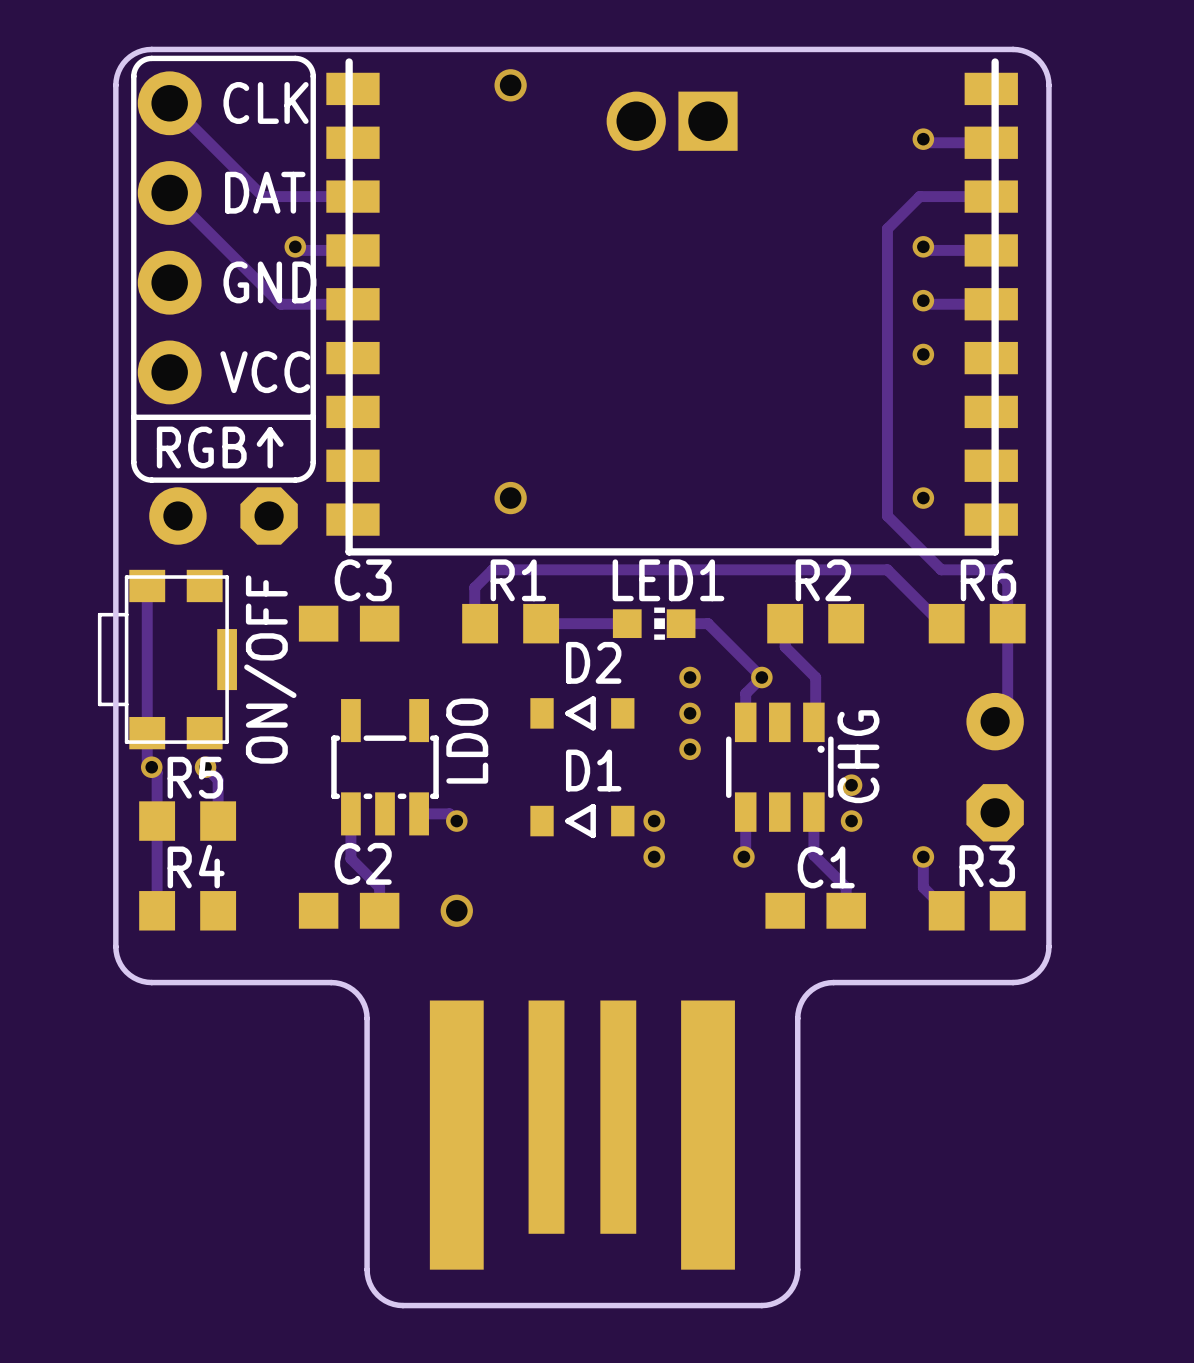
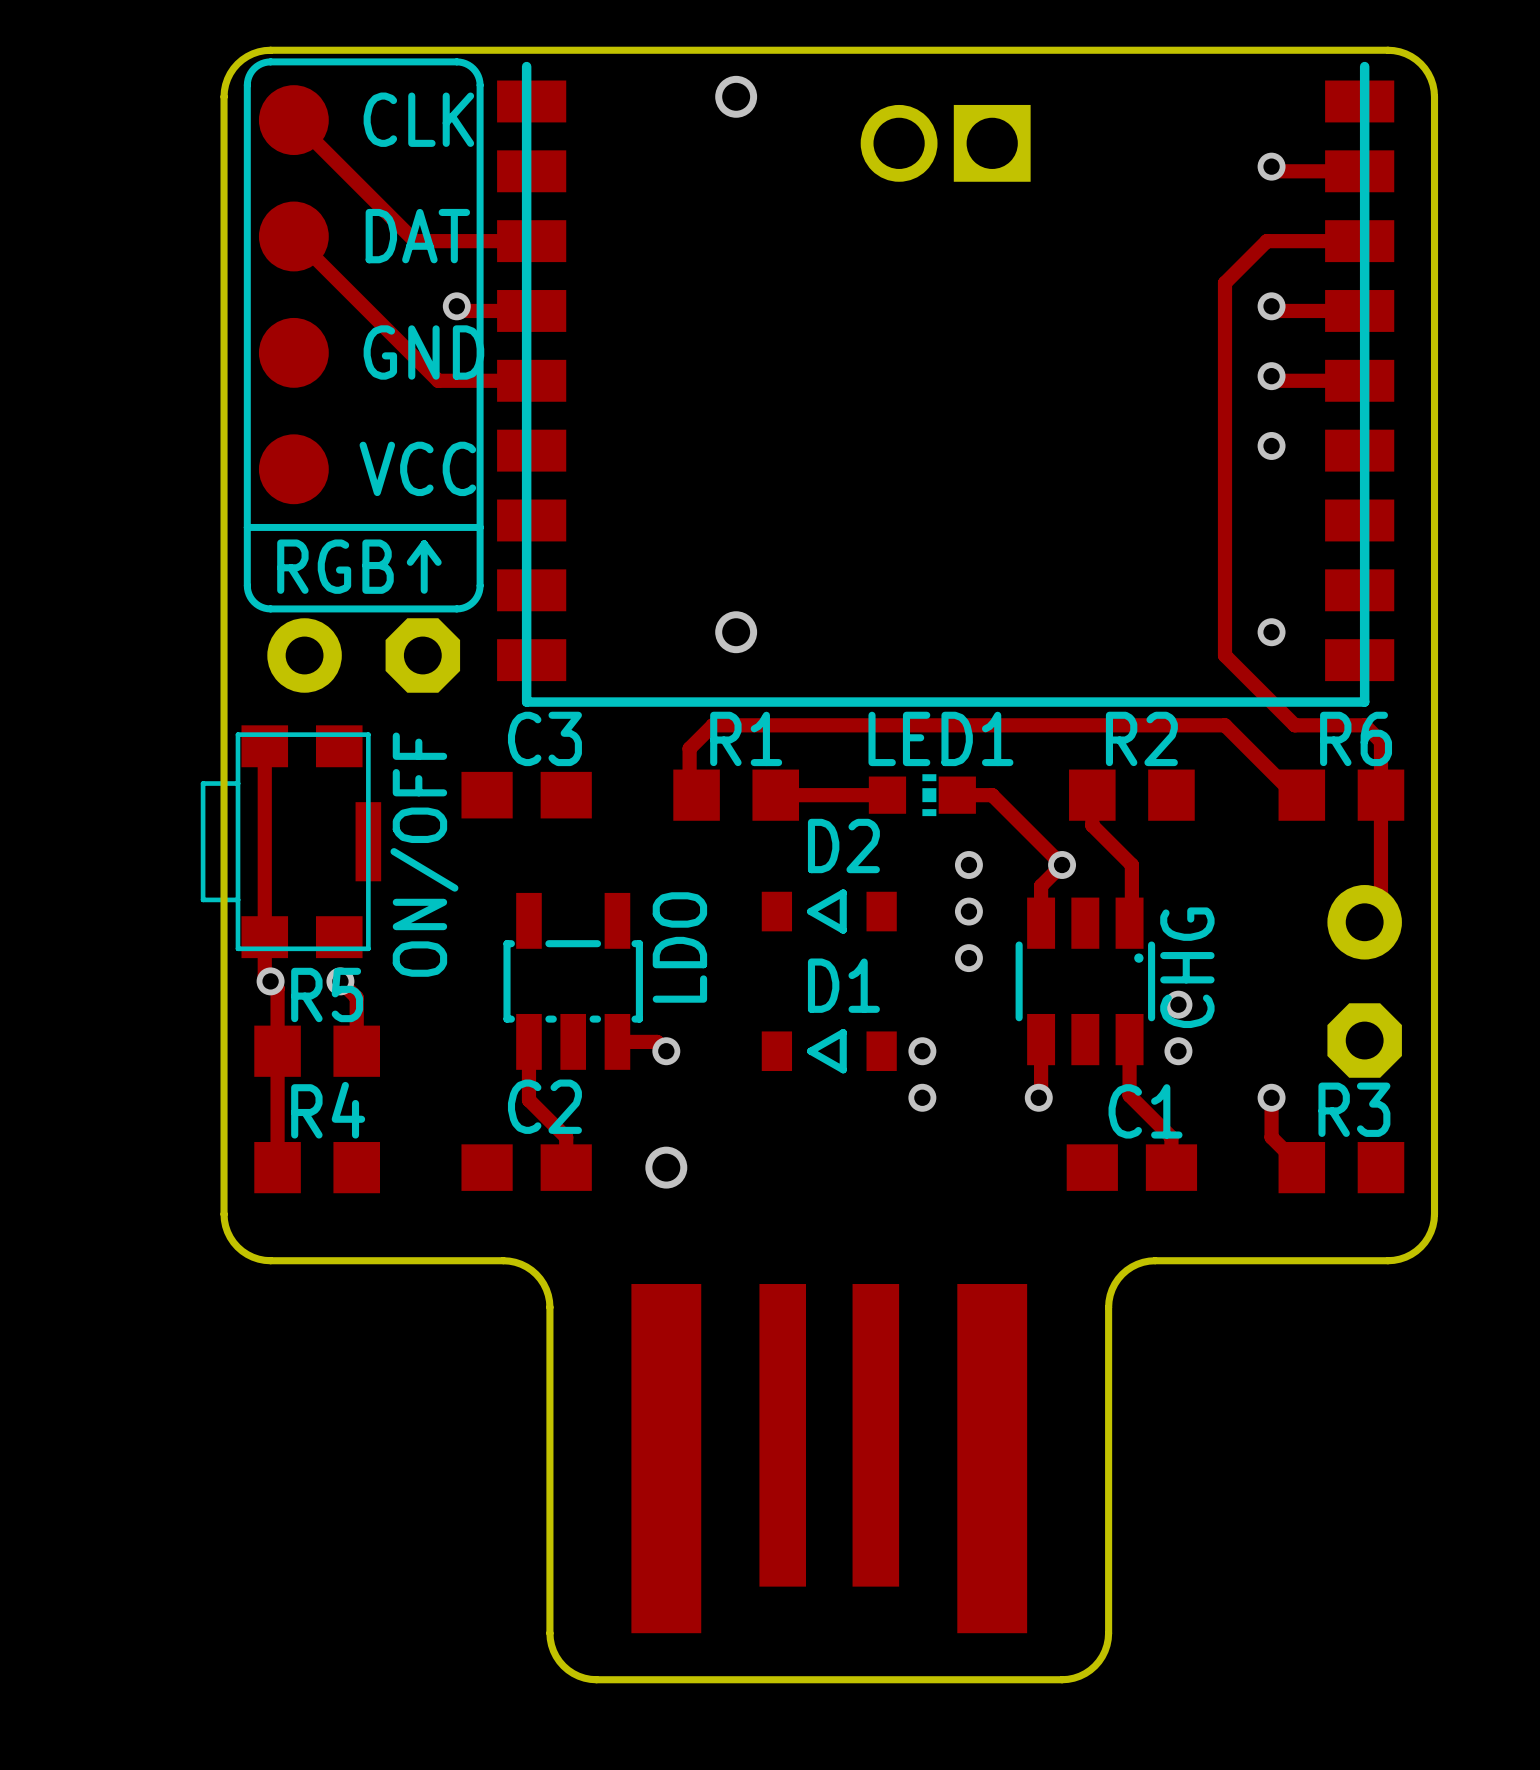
CLK footprint: [137, 71, 202, 136] -> [258, 85, 329, 156]
DAT footprint: [137, 161, 202, 225] -> [258, 201, 329, 272]
GND footprint: [137, 250, 202, 315] -> [258, 317, 329, 388]
VCC footprint: [137, 340, 202, 405] -> [258, 434, 329, 505]

